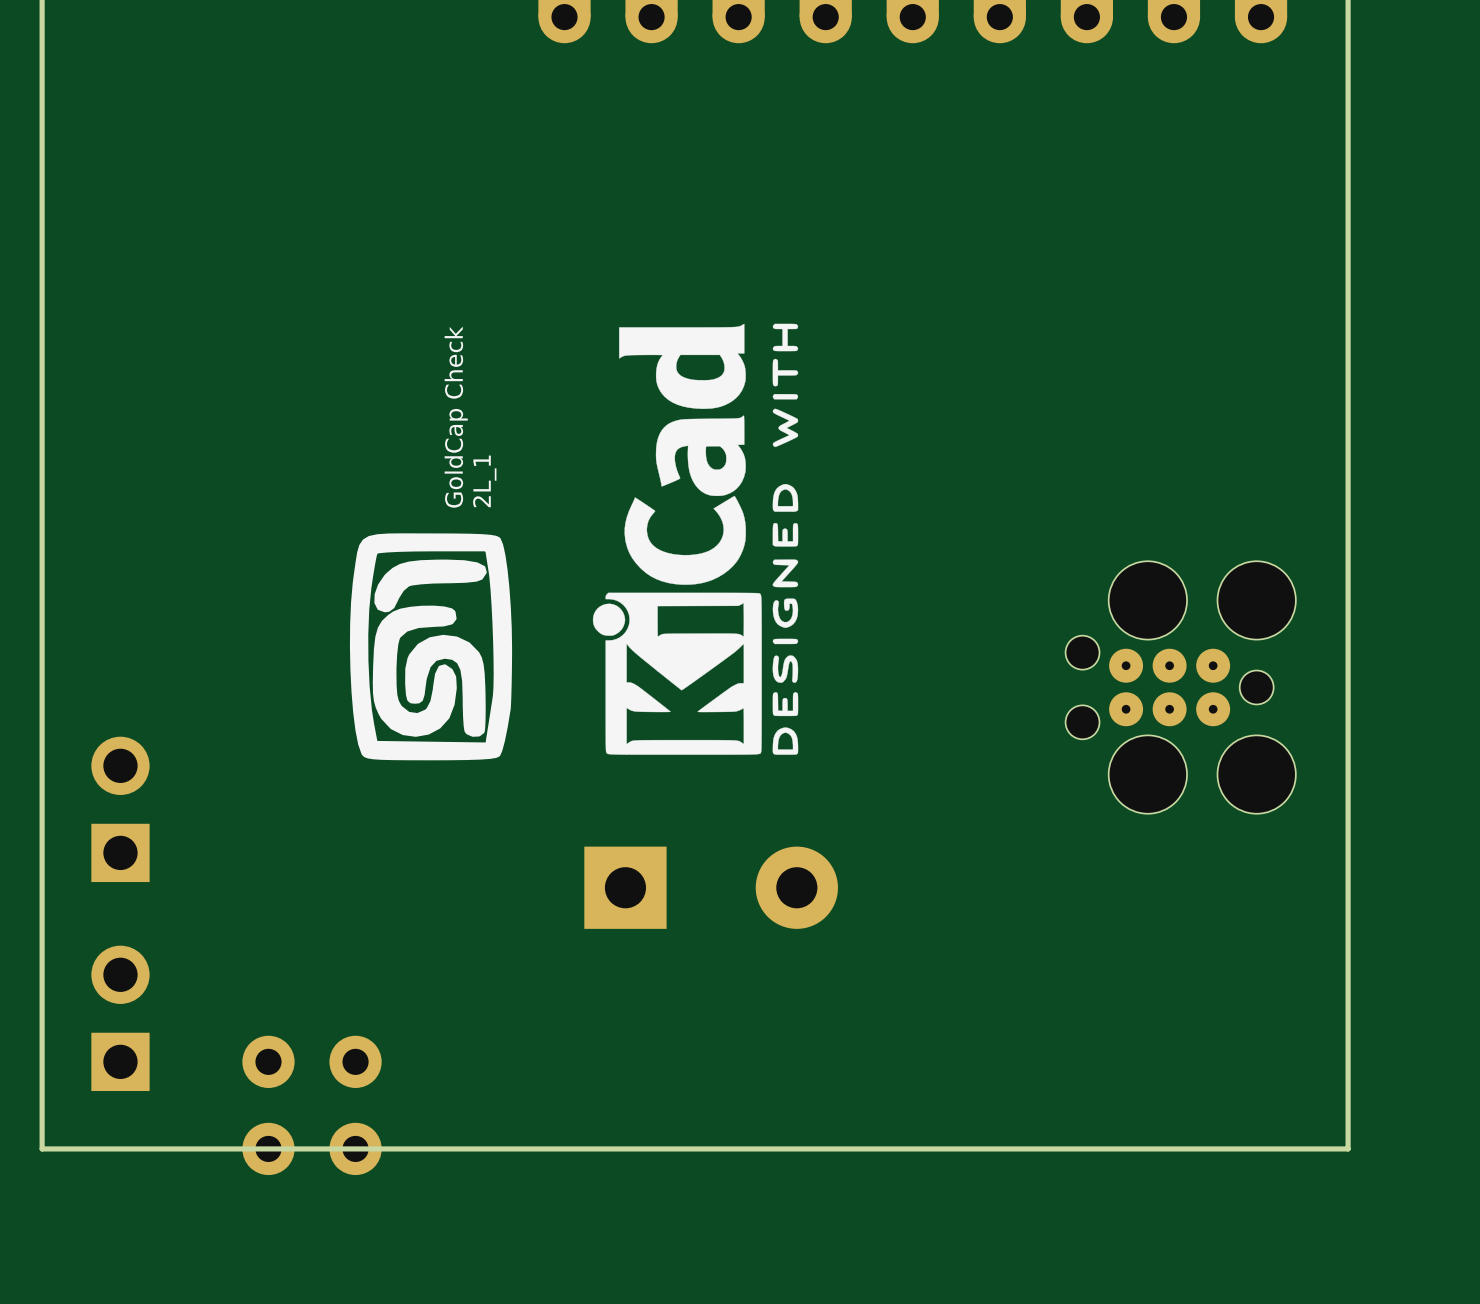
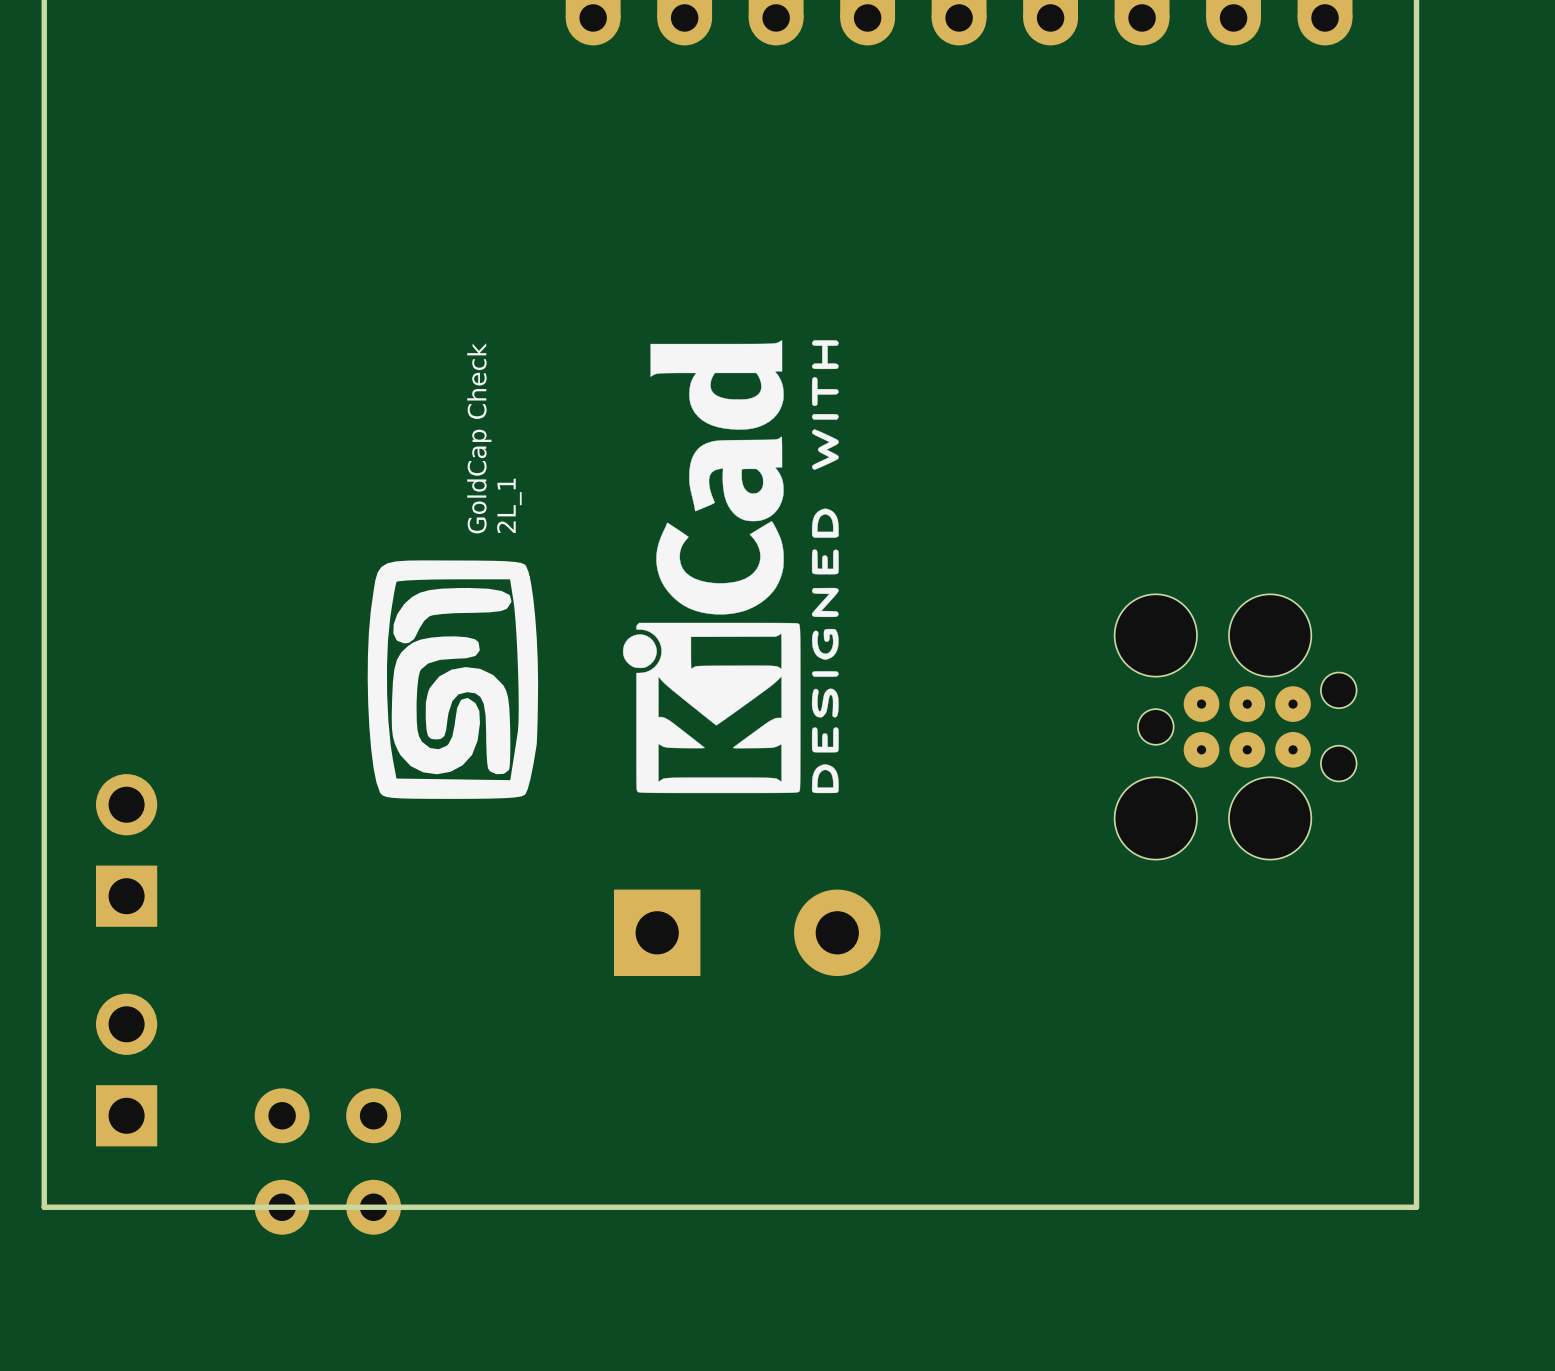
part rotation: 0° (1180, 687) -> 180° (1235, 726)

